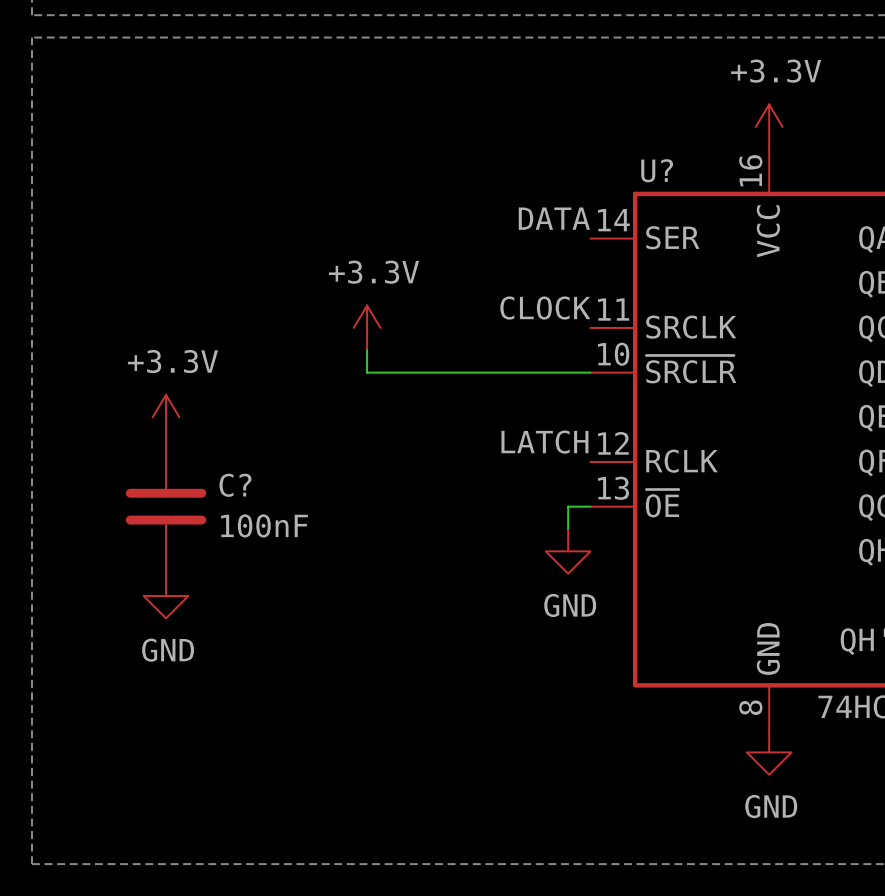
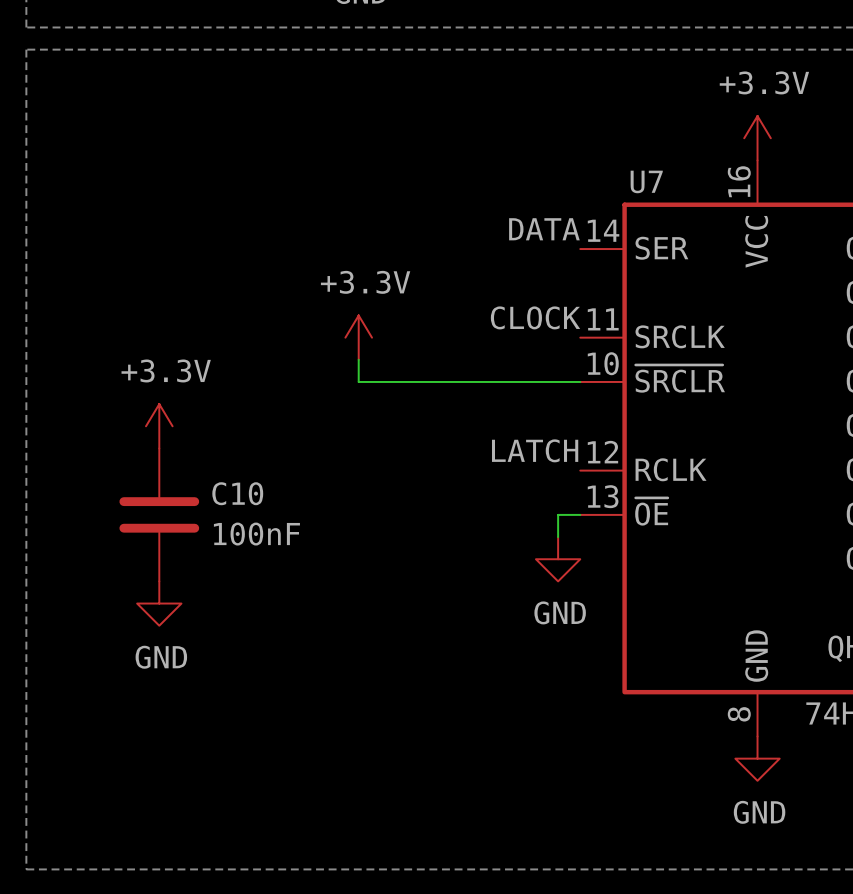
U? name: U? (657, 170) -> U7 (646, 181)
C? name: C? (235, 485) -> C10 (237, 493)

